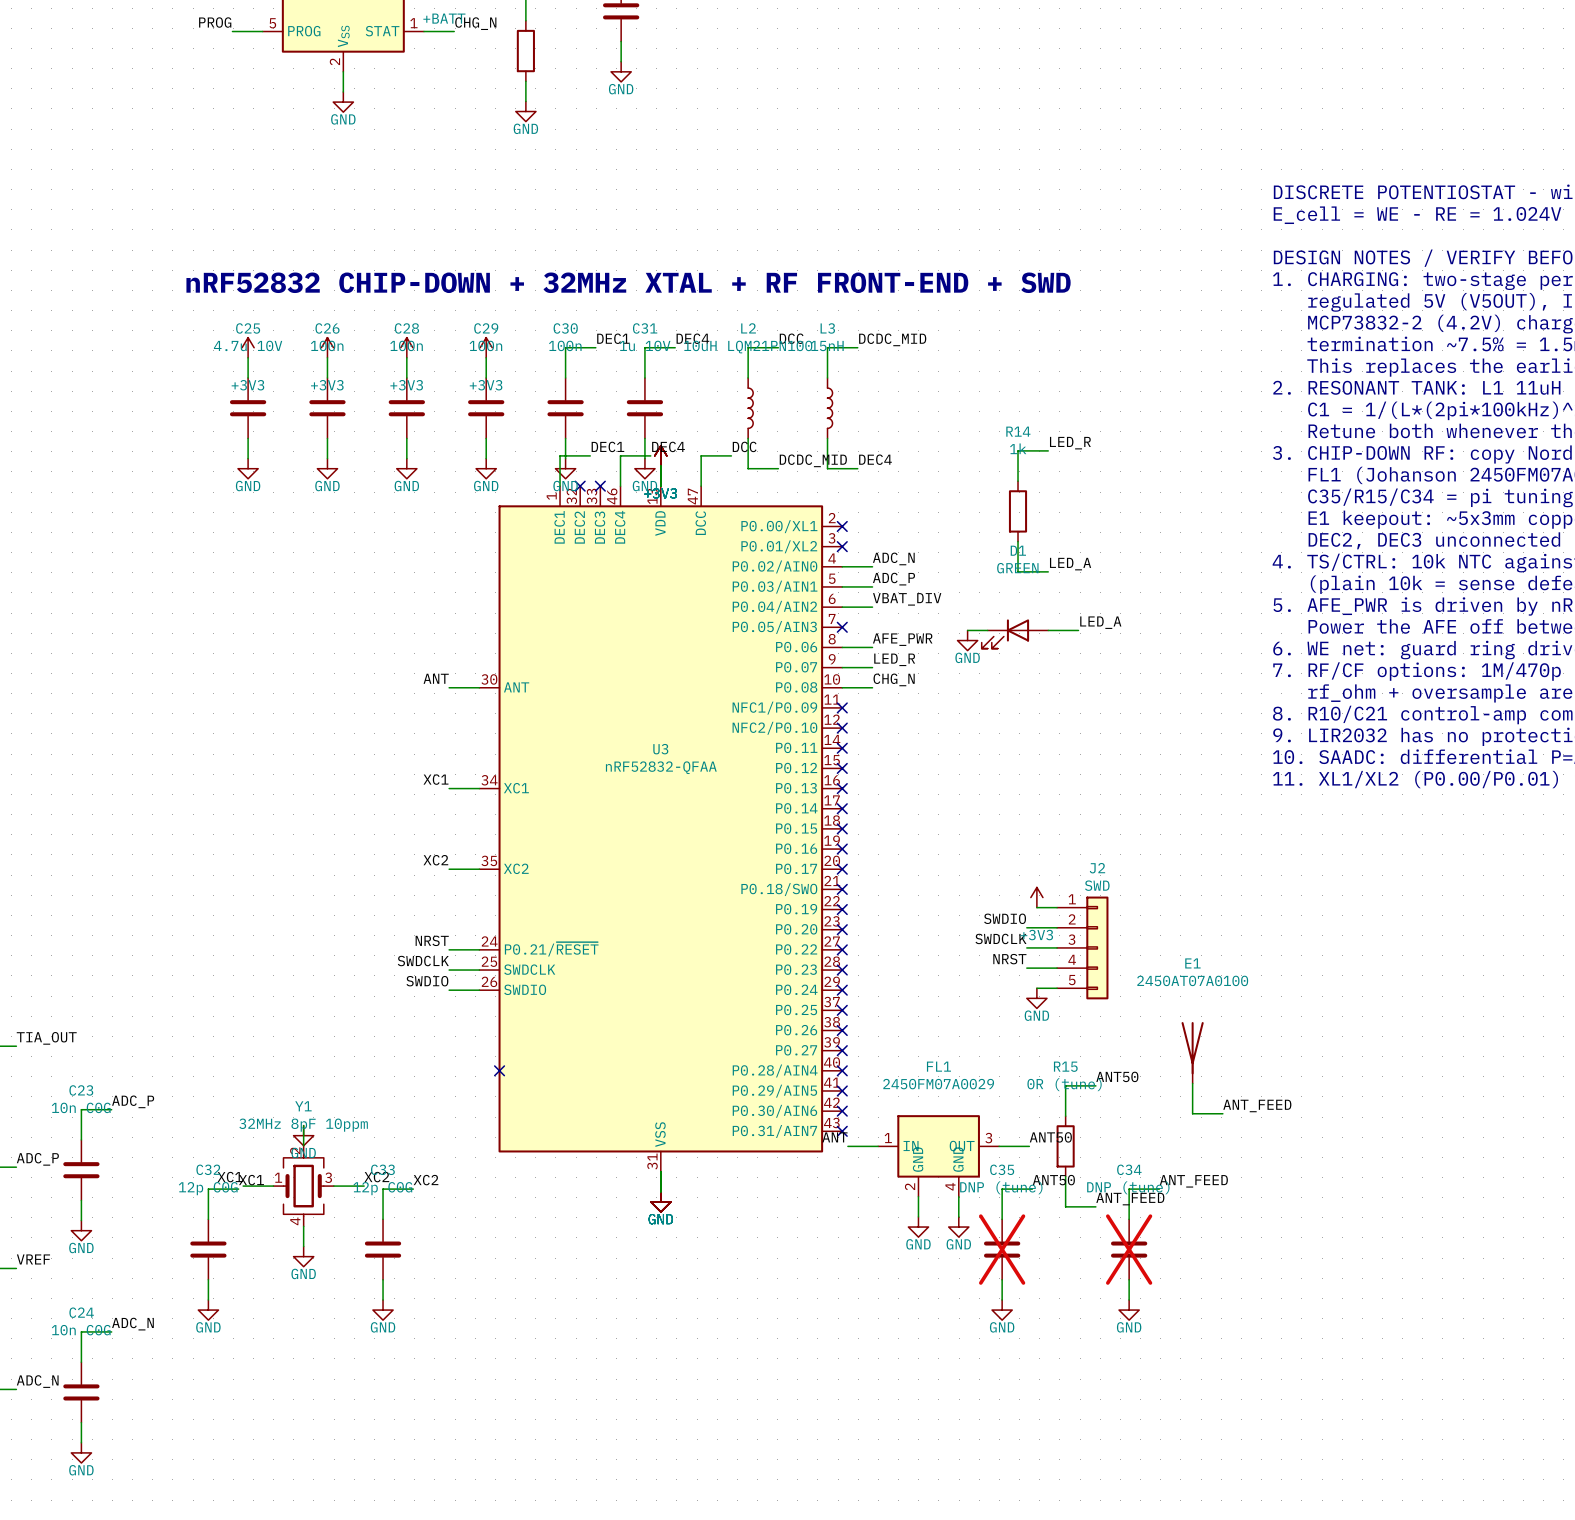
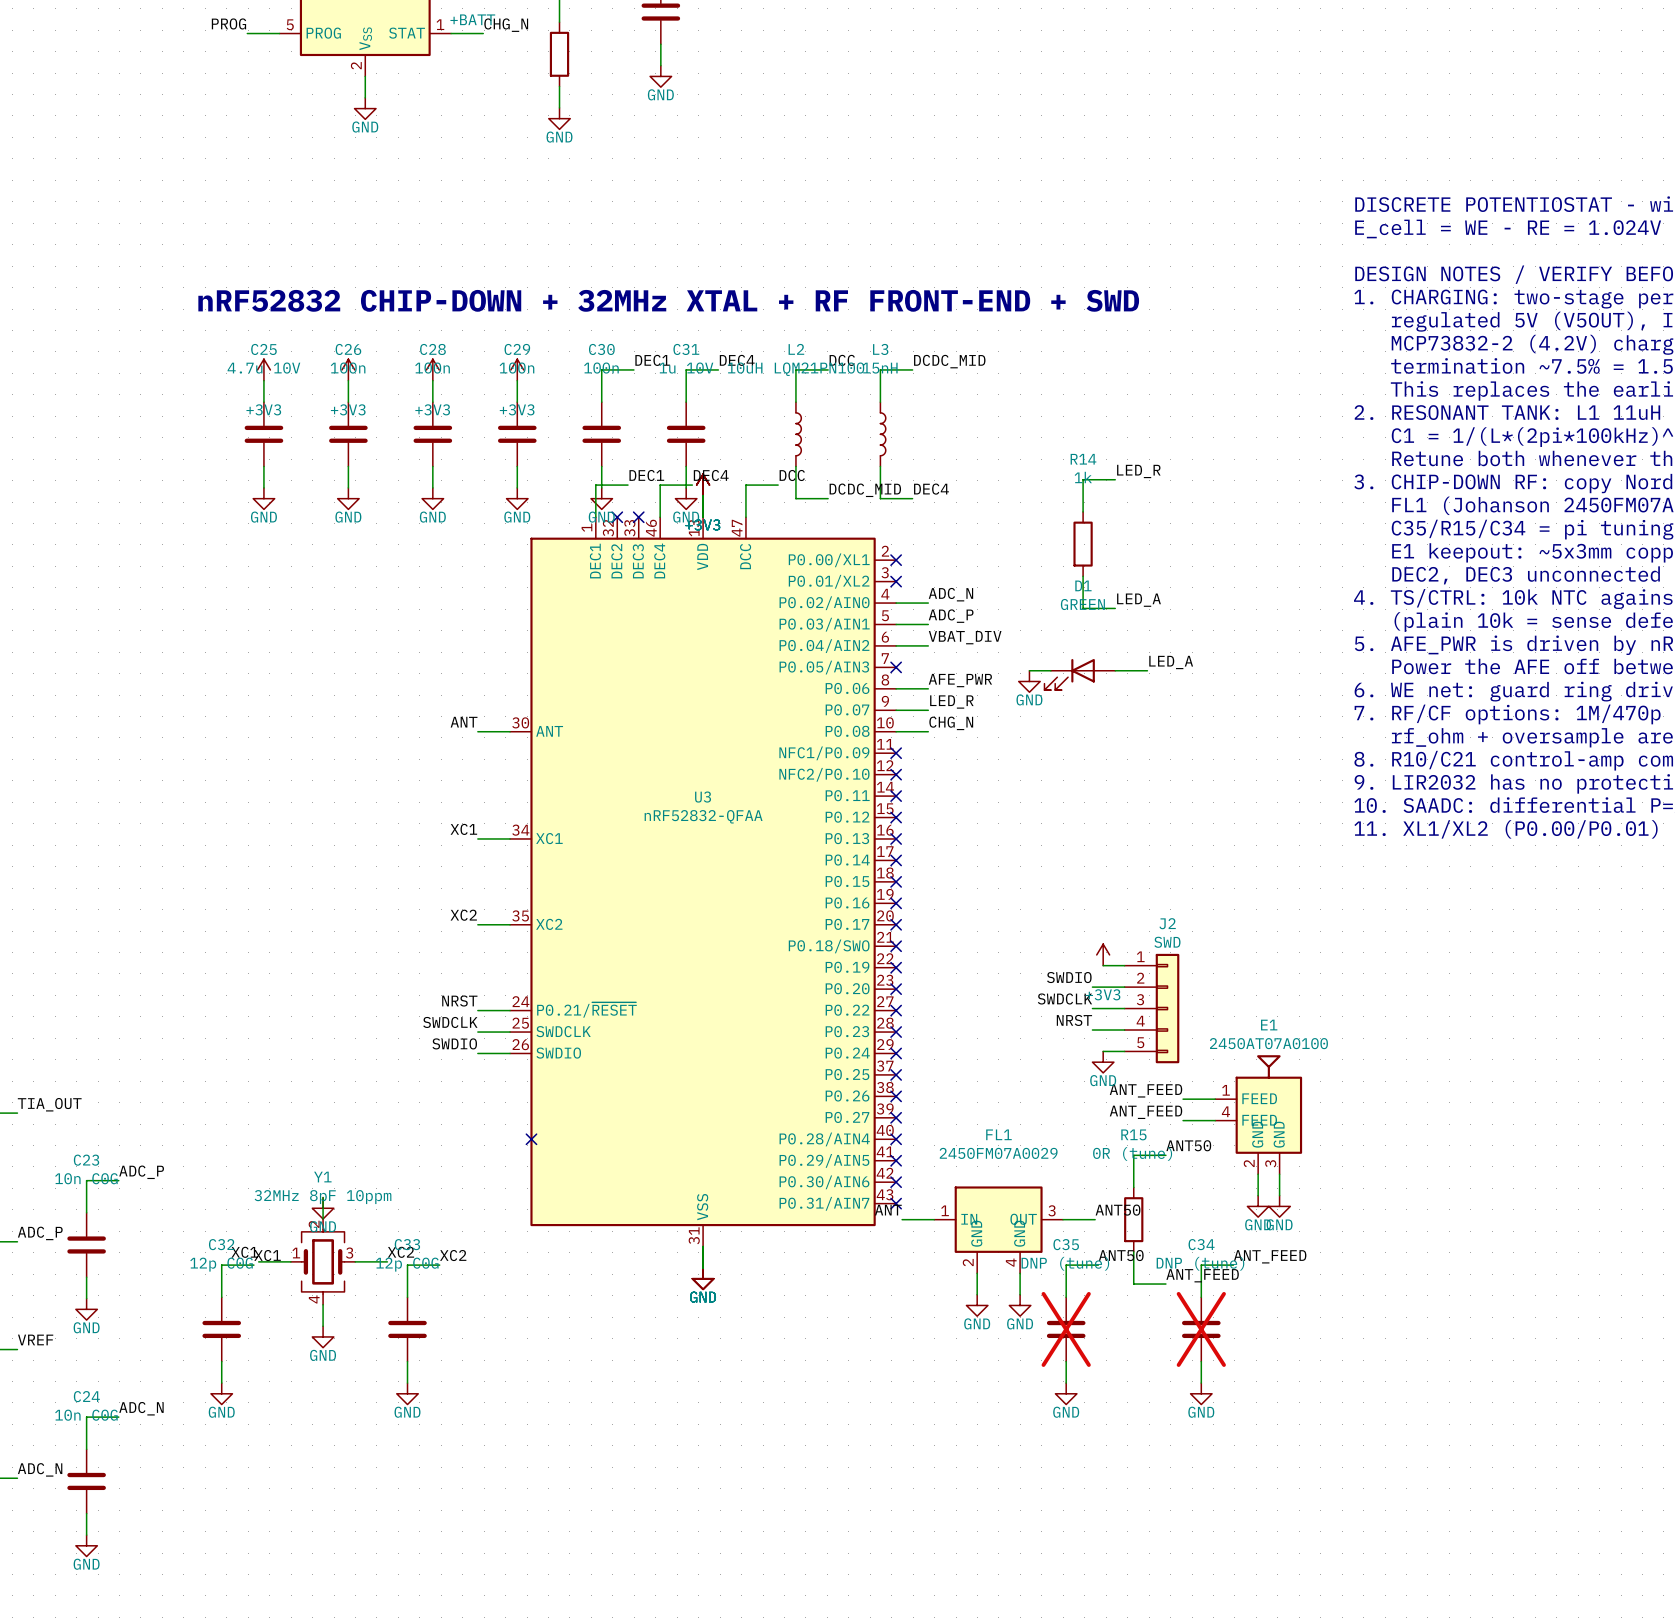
E1 symbol: [1181, 1022, 1204, 1084] -> [1215, 1055, 1303, 1175]
label: none -> ANT_FEED (1145, 1090)
wire: none -> (1183, 1099) (1215, 1099)
label: none -> ANT_FEED (1145, 1112)
wire: none -> (1183, 1120) (1215, 1120)
wire: (1192, 1083) (1192, 1113) (1222, 1113) -> none
wire: none -> (1258, 1174) (1258, 1195)
wire: none -> (1279, 1174) (1279, 1195)
label: ANT_FEED (1257, 1105) -> none
power symbol: none -> GND (1258, 1206)
power symbol: none -> GND (1279, 1206)

